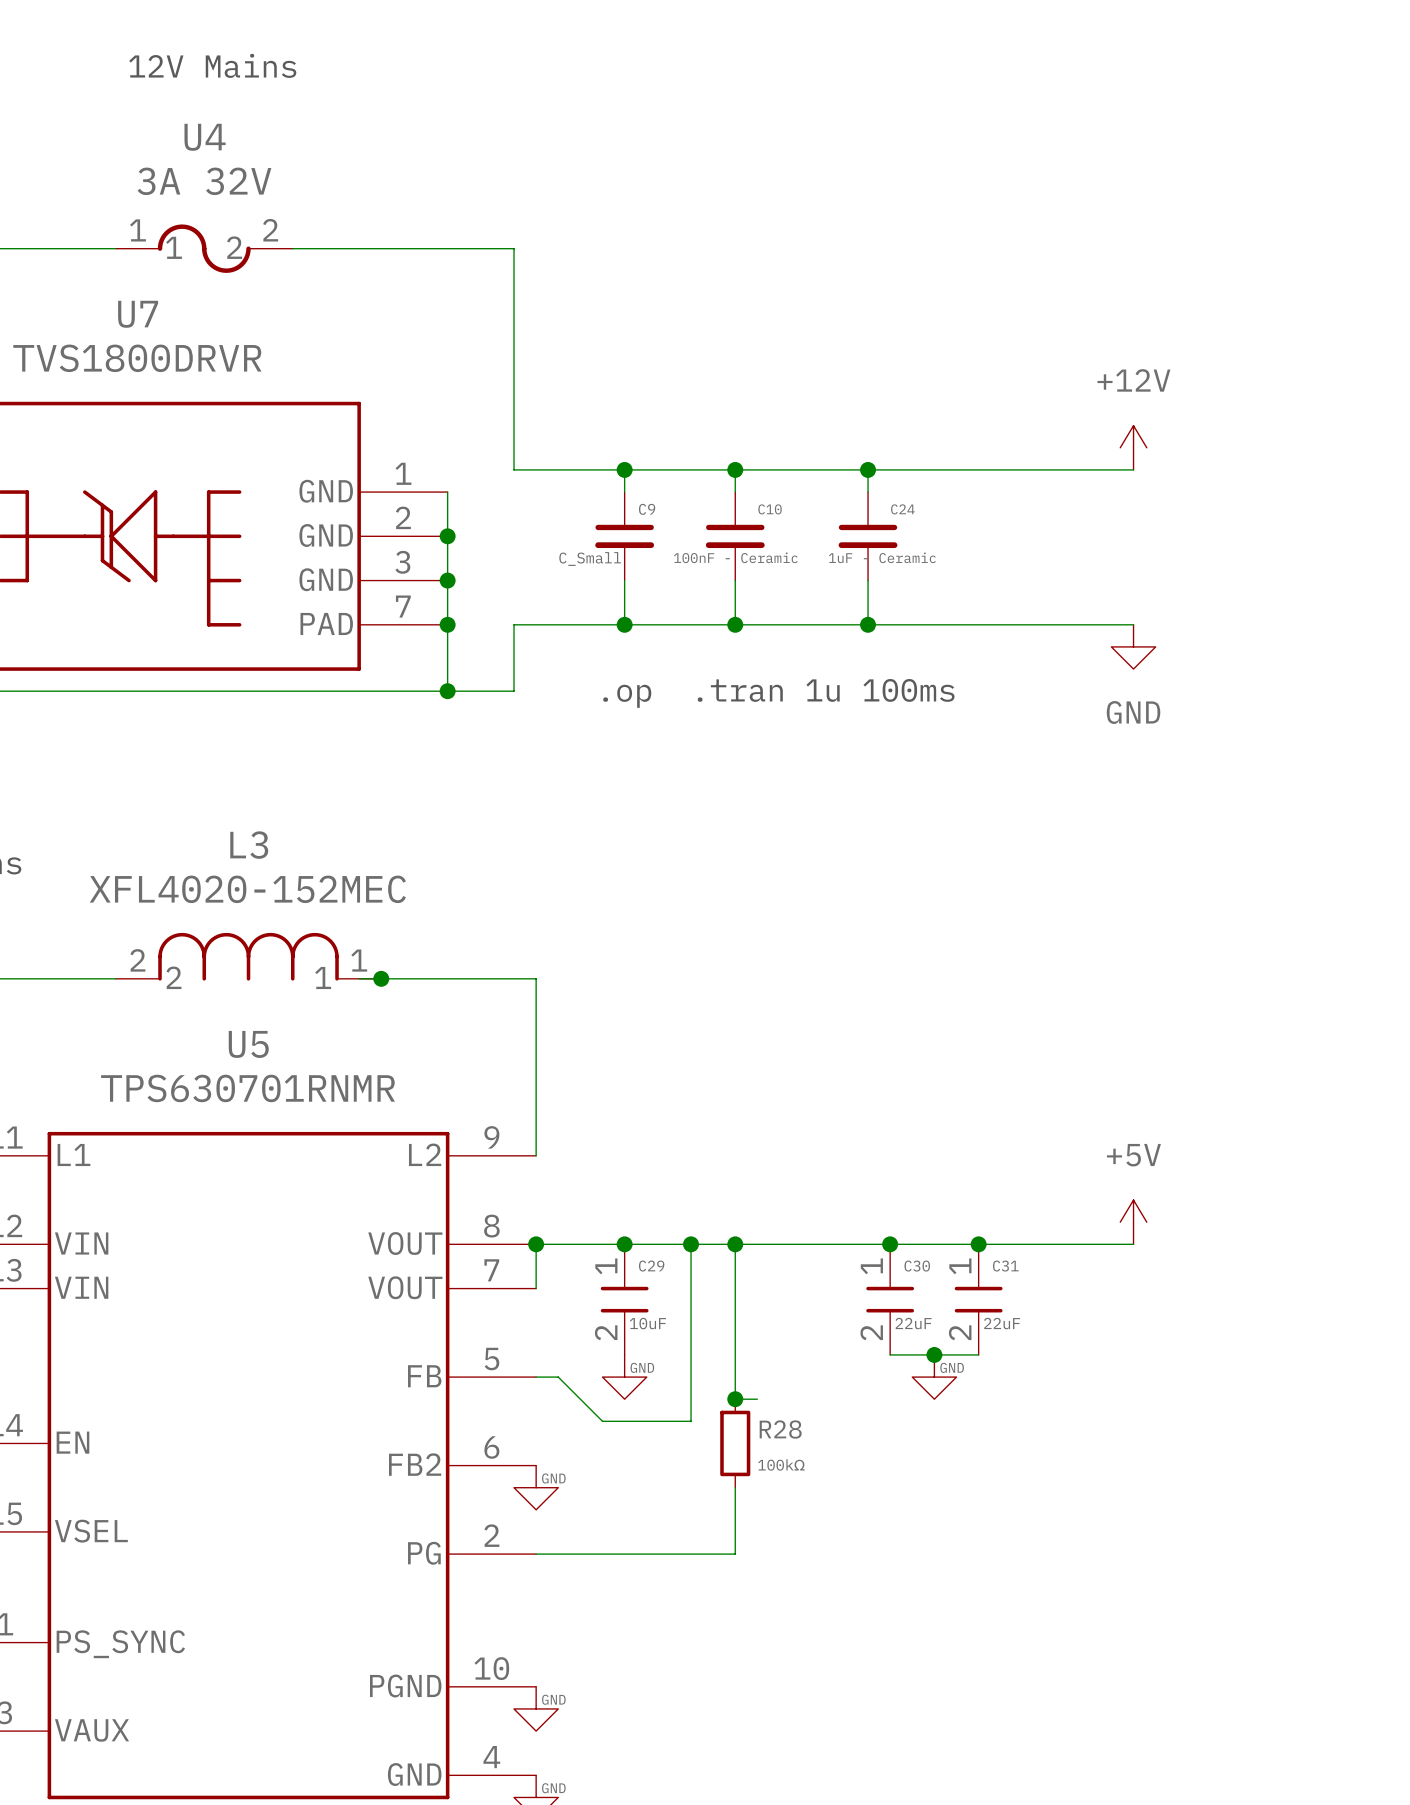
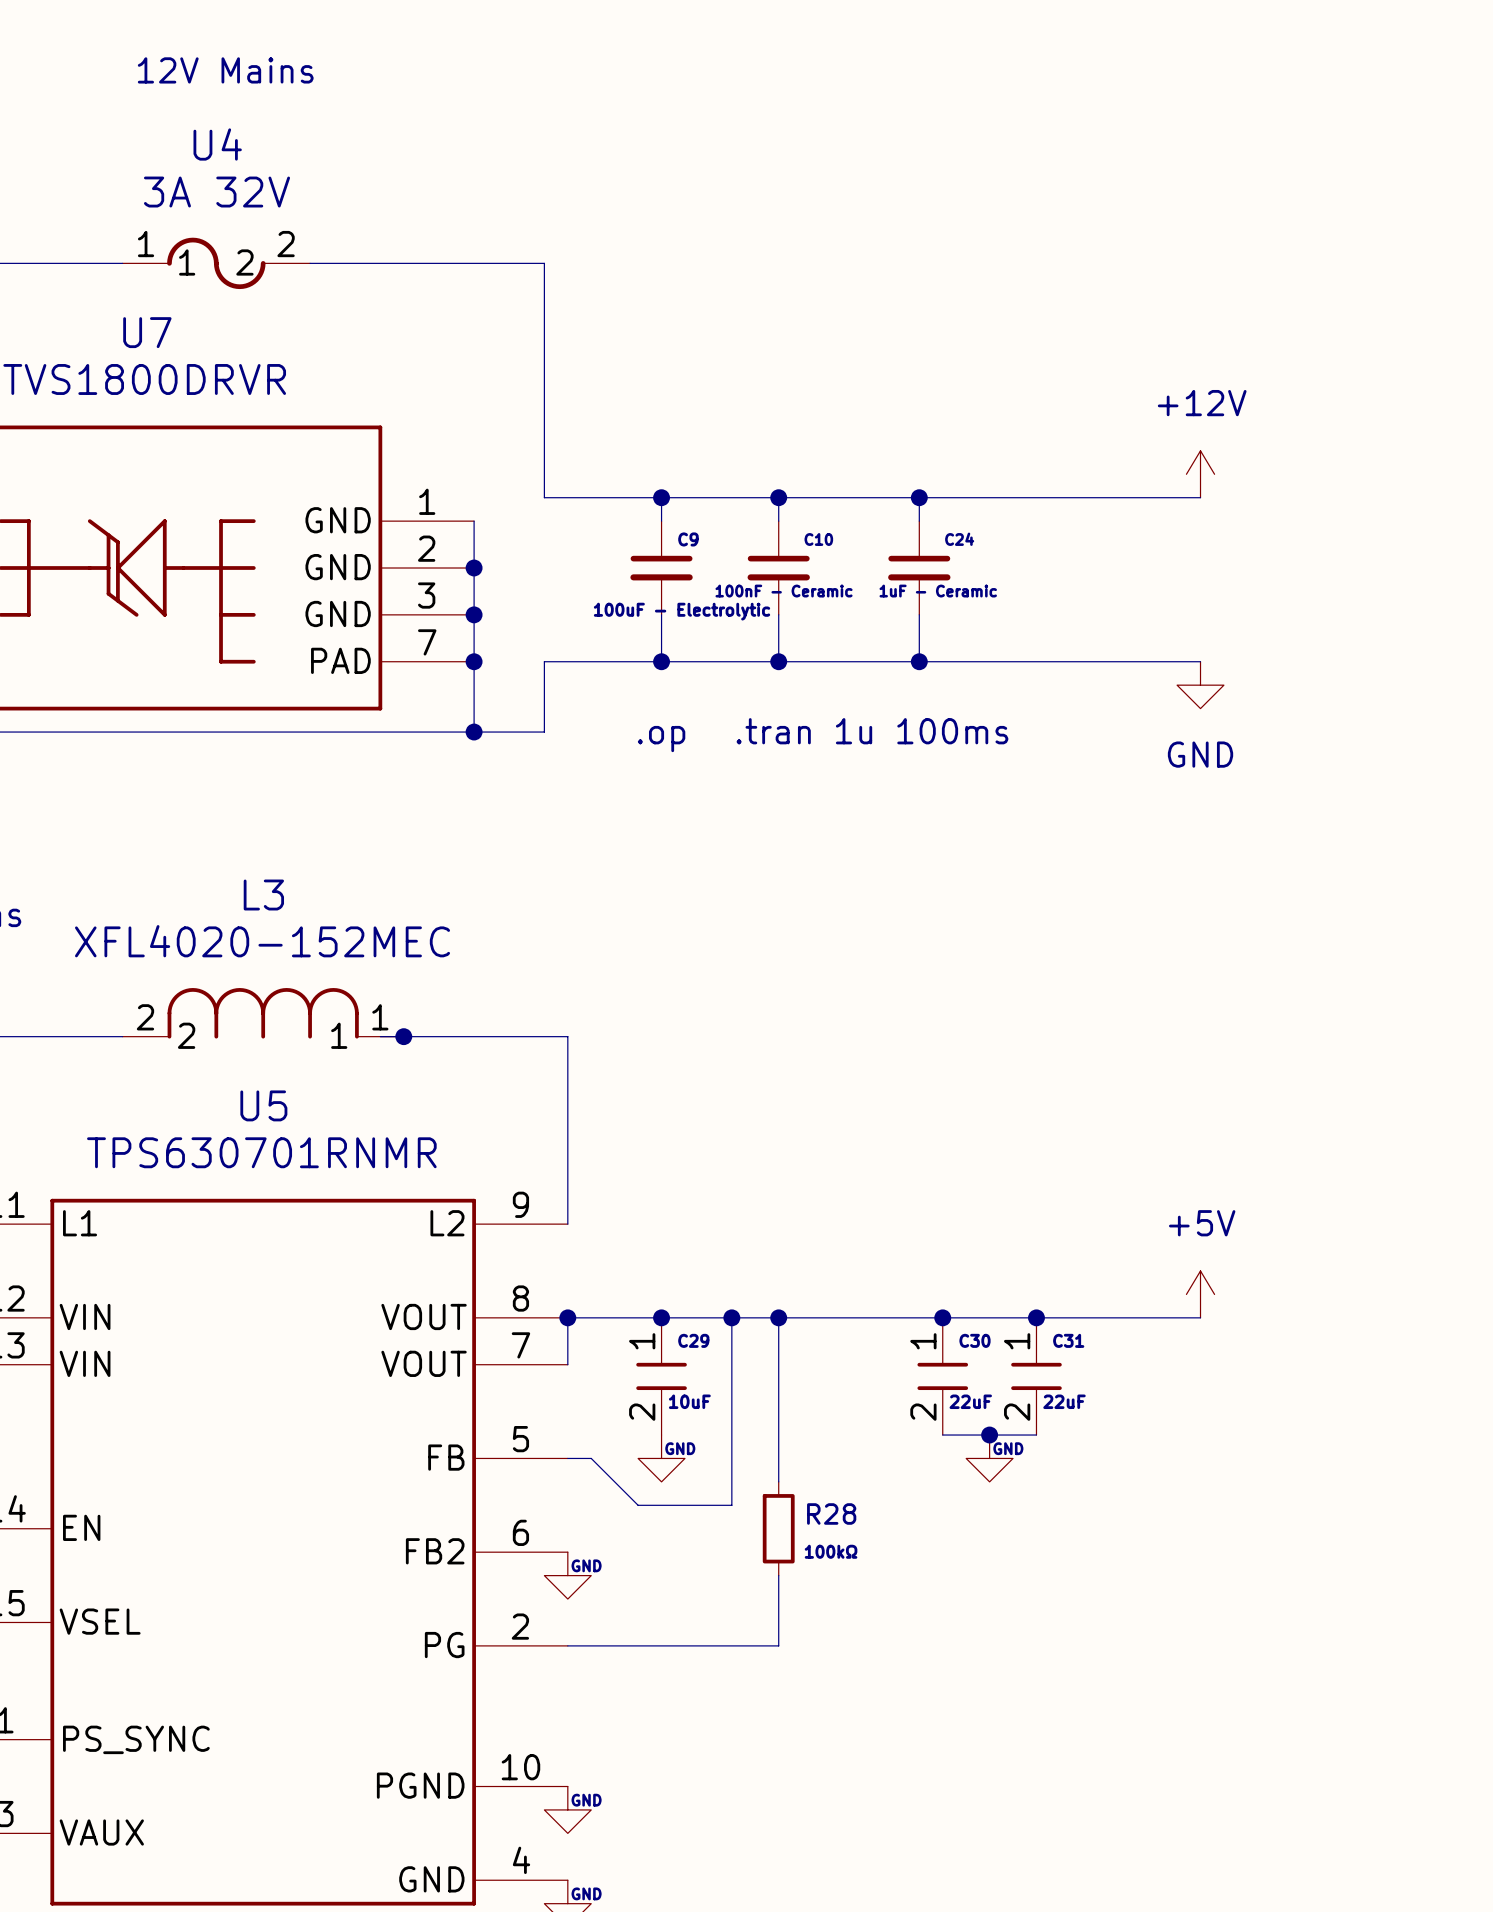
C9 value: C_Small (590, 559) -> 100uF - Electrolytic (682, 611)
wire: (735, 1399) (757, 1399) -> none
junction: (735, 1399) -> none

